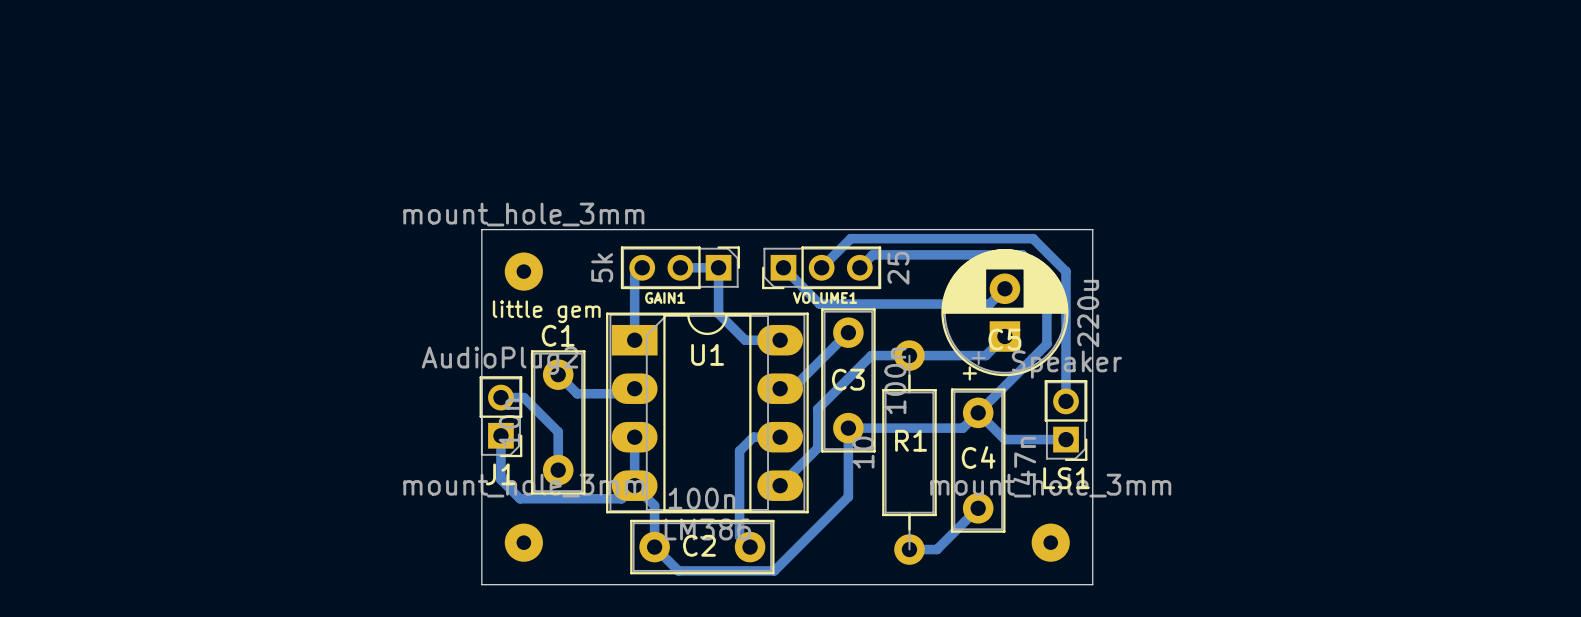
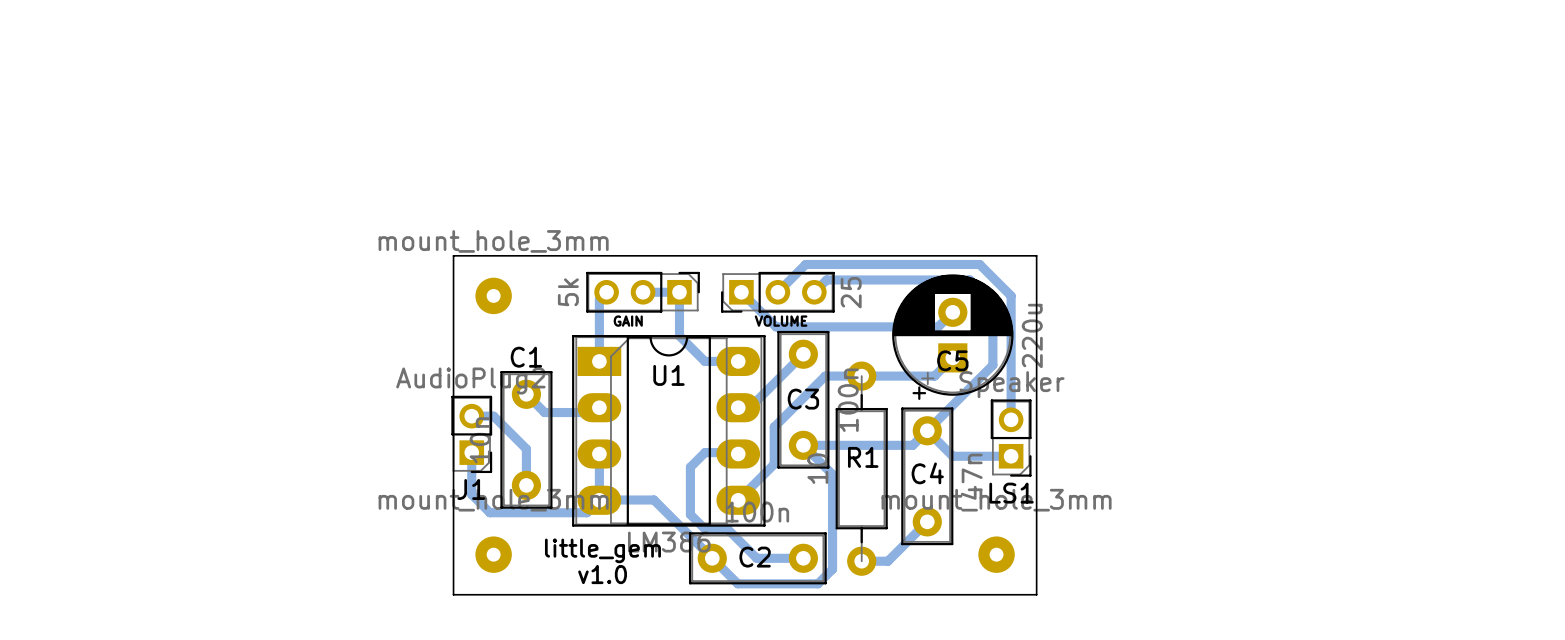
GAIN1 name: GAIN1 (665, 297) -> GAIN (628, 321)
VOLUME1 name: VOLUME1 (825, 297) -> VOLUME (781, 321)
text: little gem (546, 311) -> none
bottom track: (848, 428) (848, 496) (774, 570) (678, 570) (654, 547) (654, 505) (634, 485) -> (803, 445) (832, 474) (832, 569) (817, 583) (737, 583) (653, 500) (599, 500)
bottom track: (780, 437) (753, 437) (739, 451) (739, 536) (750, 547) -> (738, 453) (705, 452) (690, 467) (690, 514) (705, 529) (727, 529) (756, 558) (803, 558)
text: none -> little_gem (602, 550)
C2 position: (702, 547) -> (757, 558)
text: none -> v1.0 (602, 574)

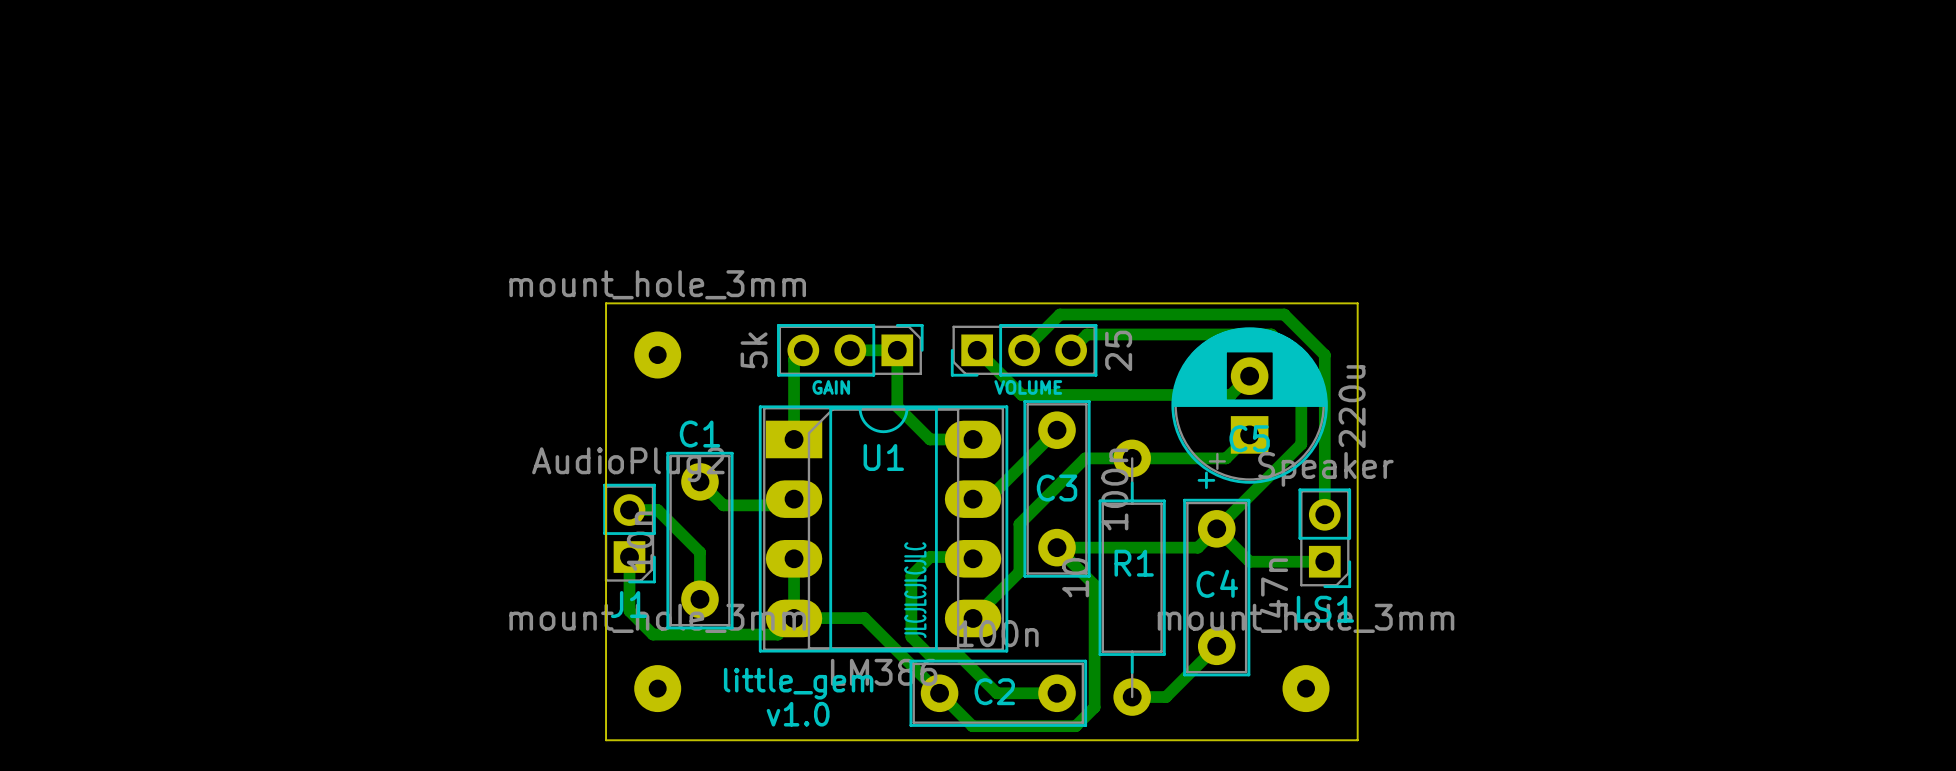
text: none -> JLCJLCJLCJLC (915, 590)

